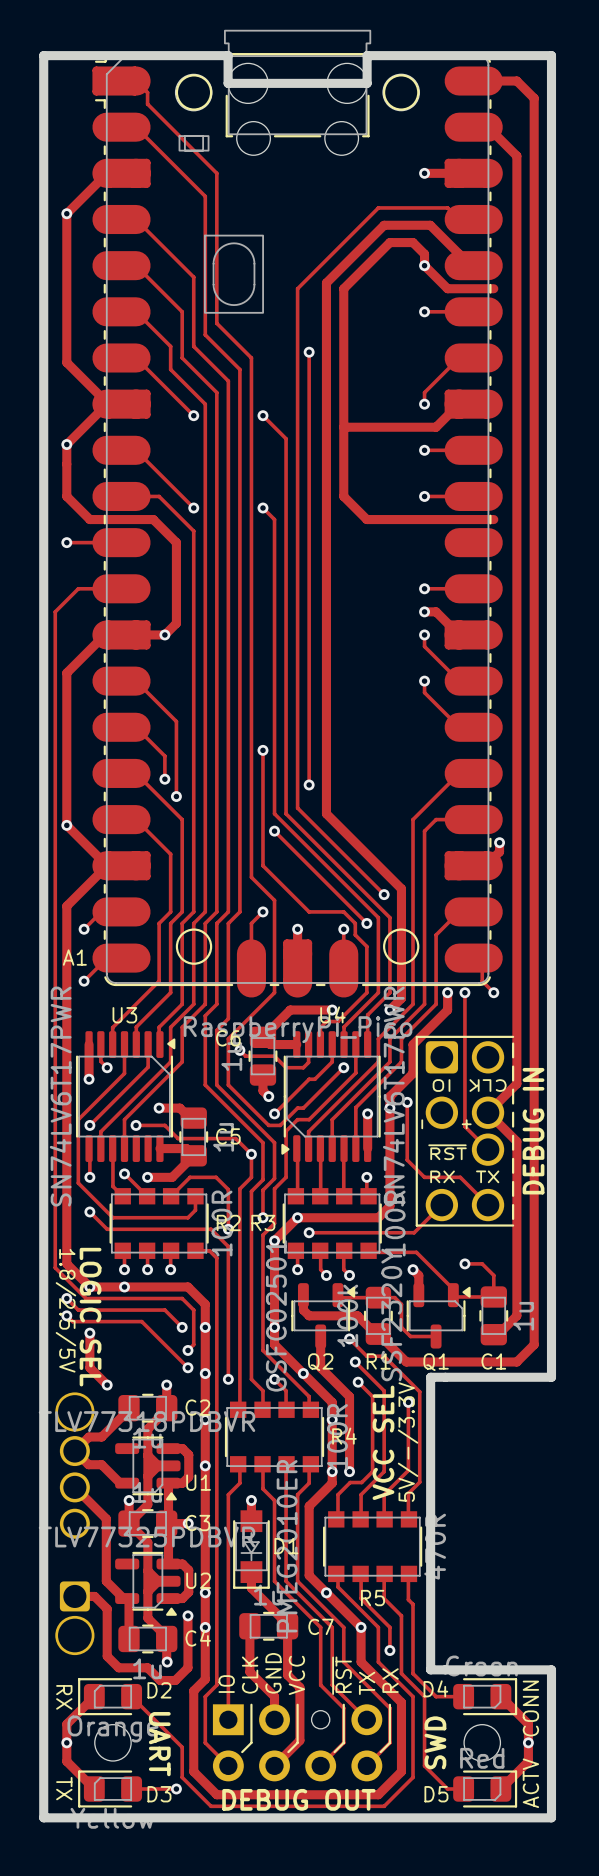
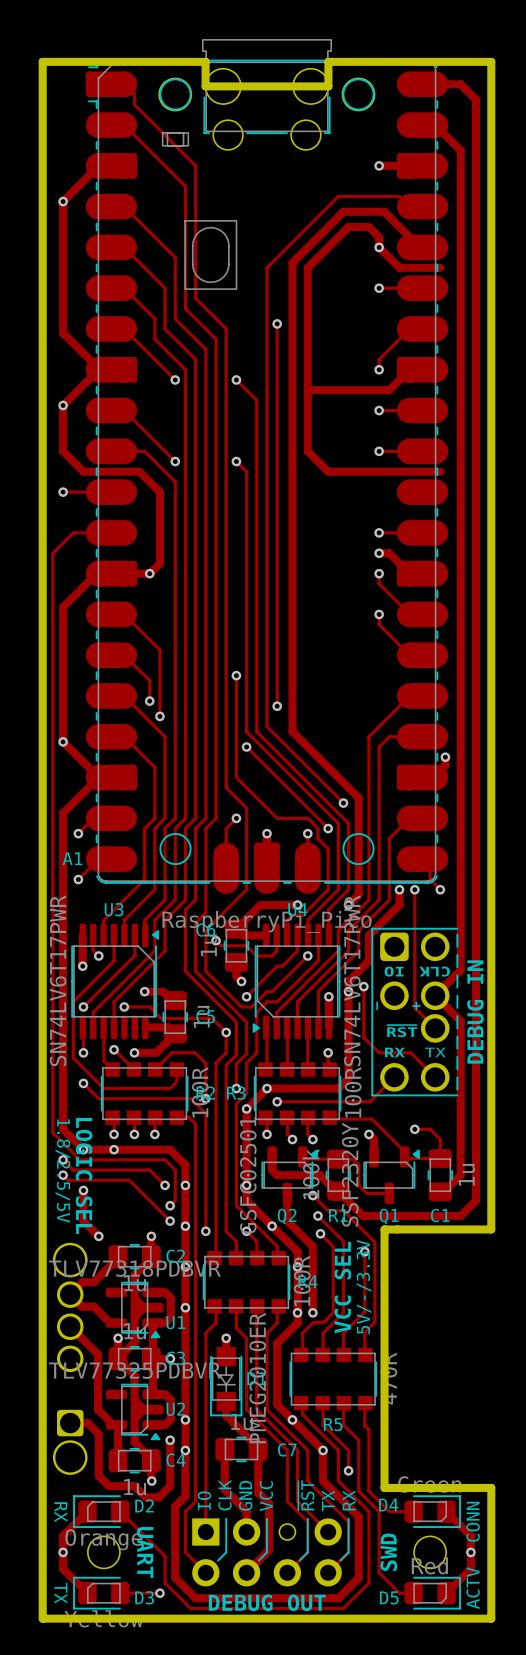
part footprint: [415, 1035, 515, 1227] -> [371, 927, 459, 1097]

